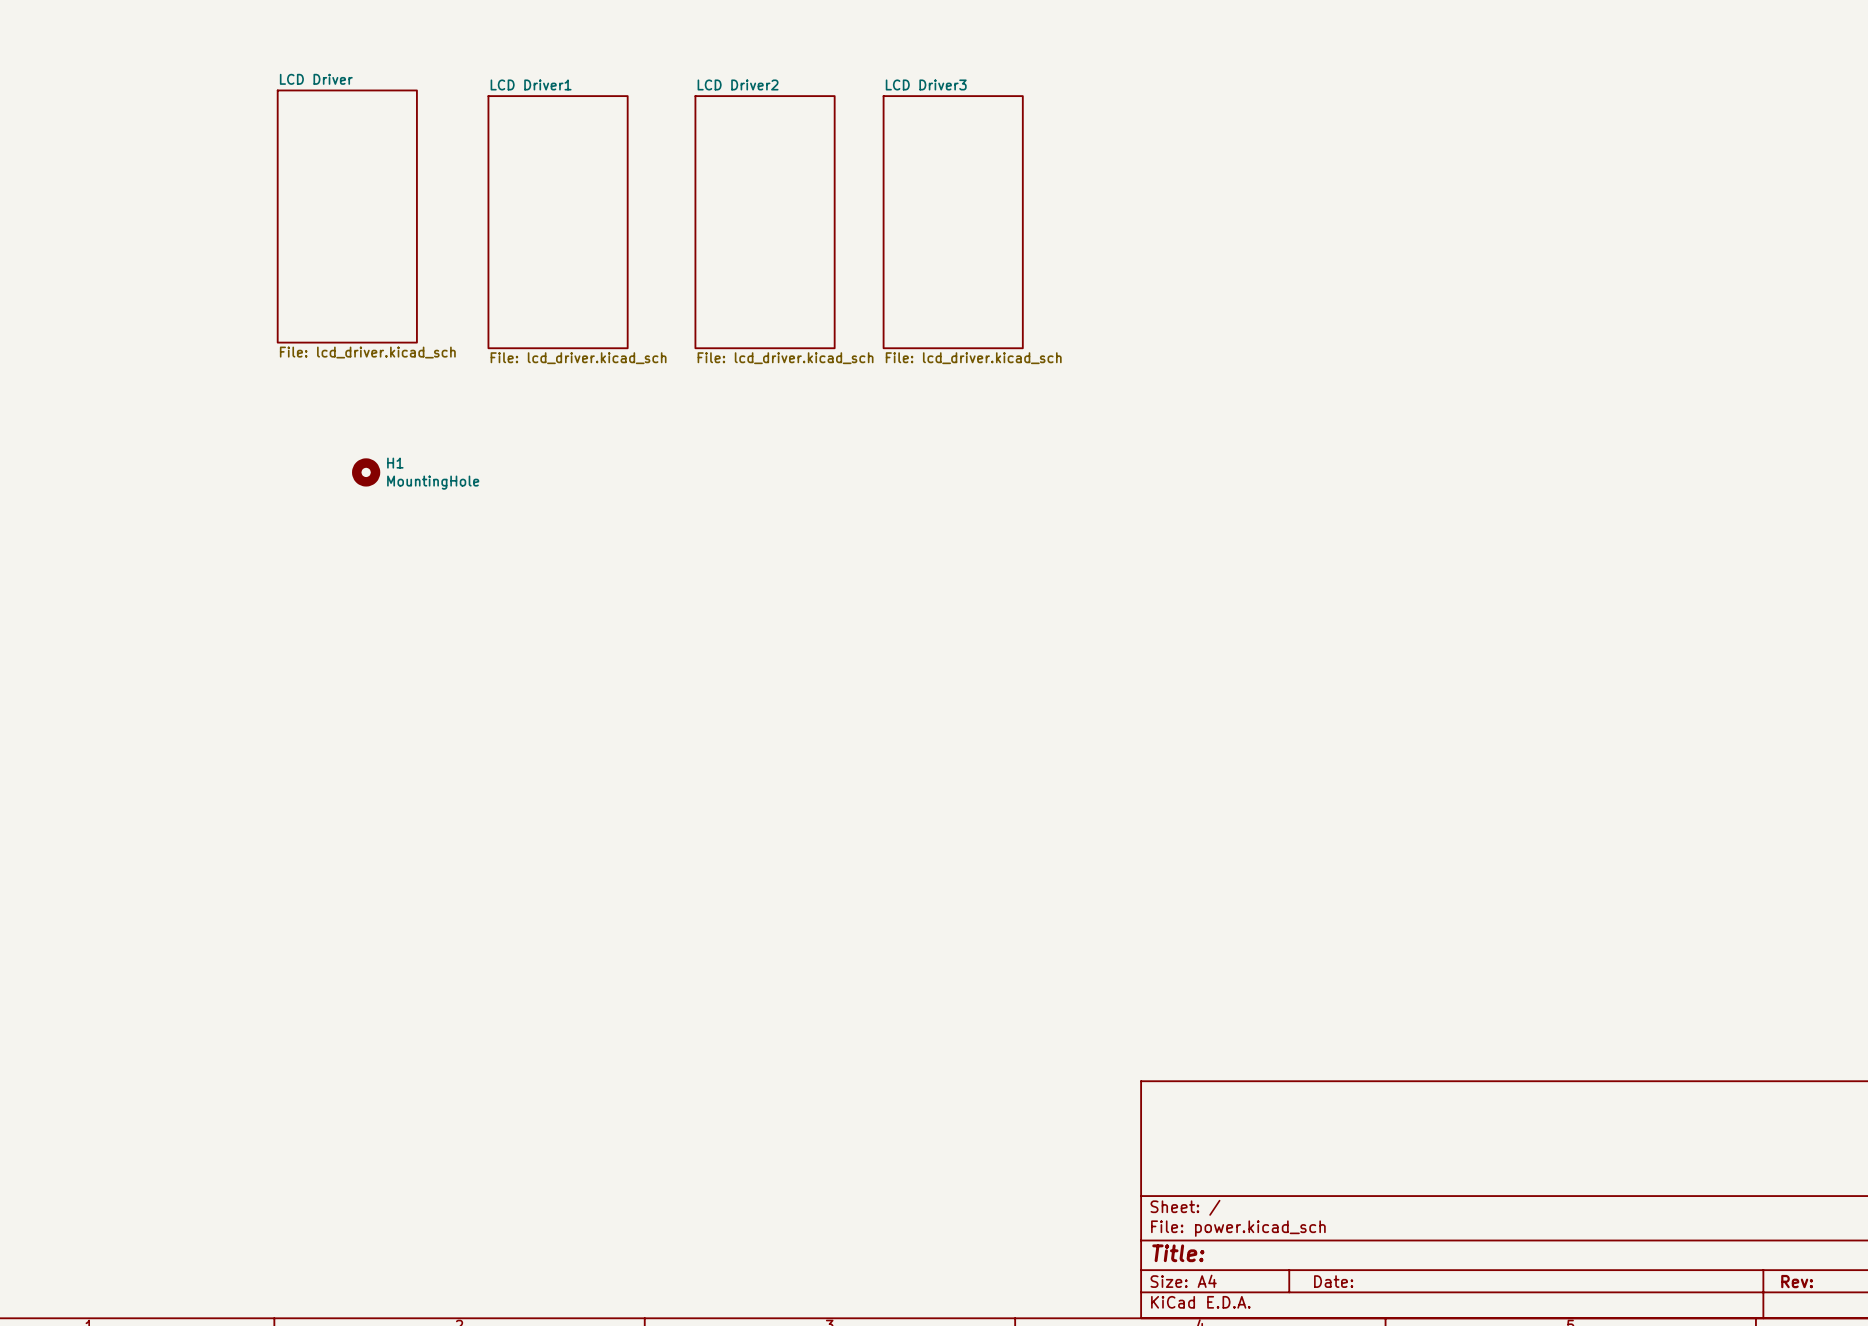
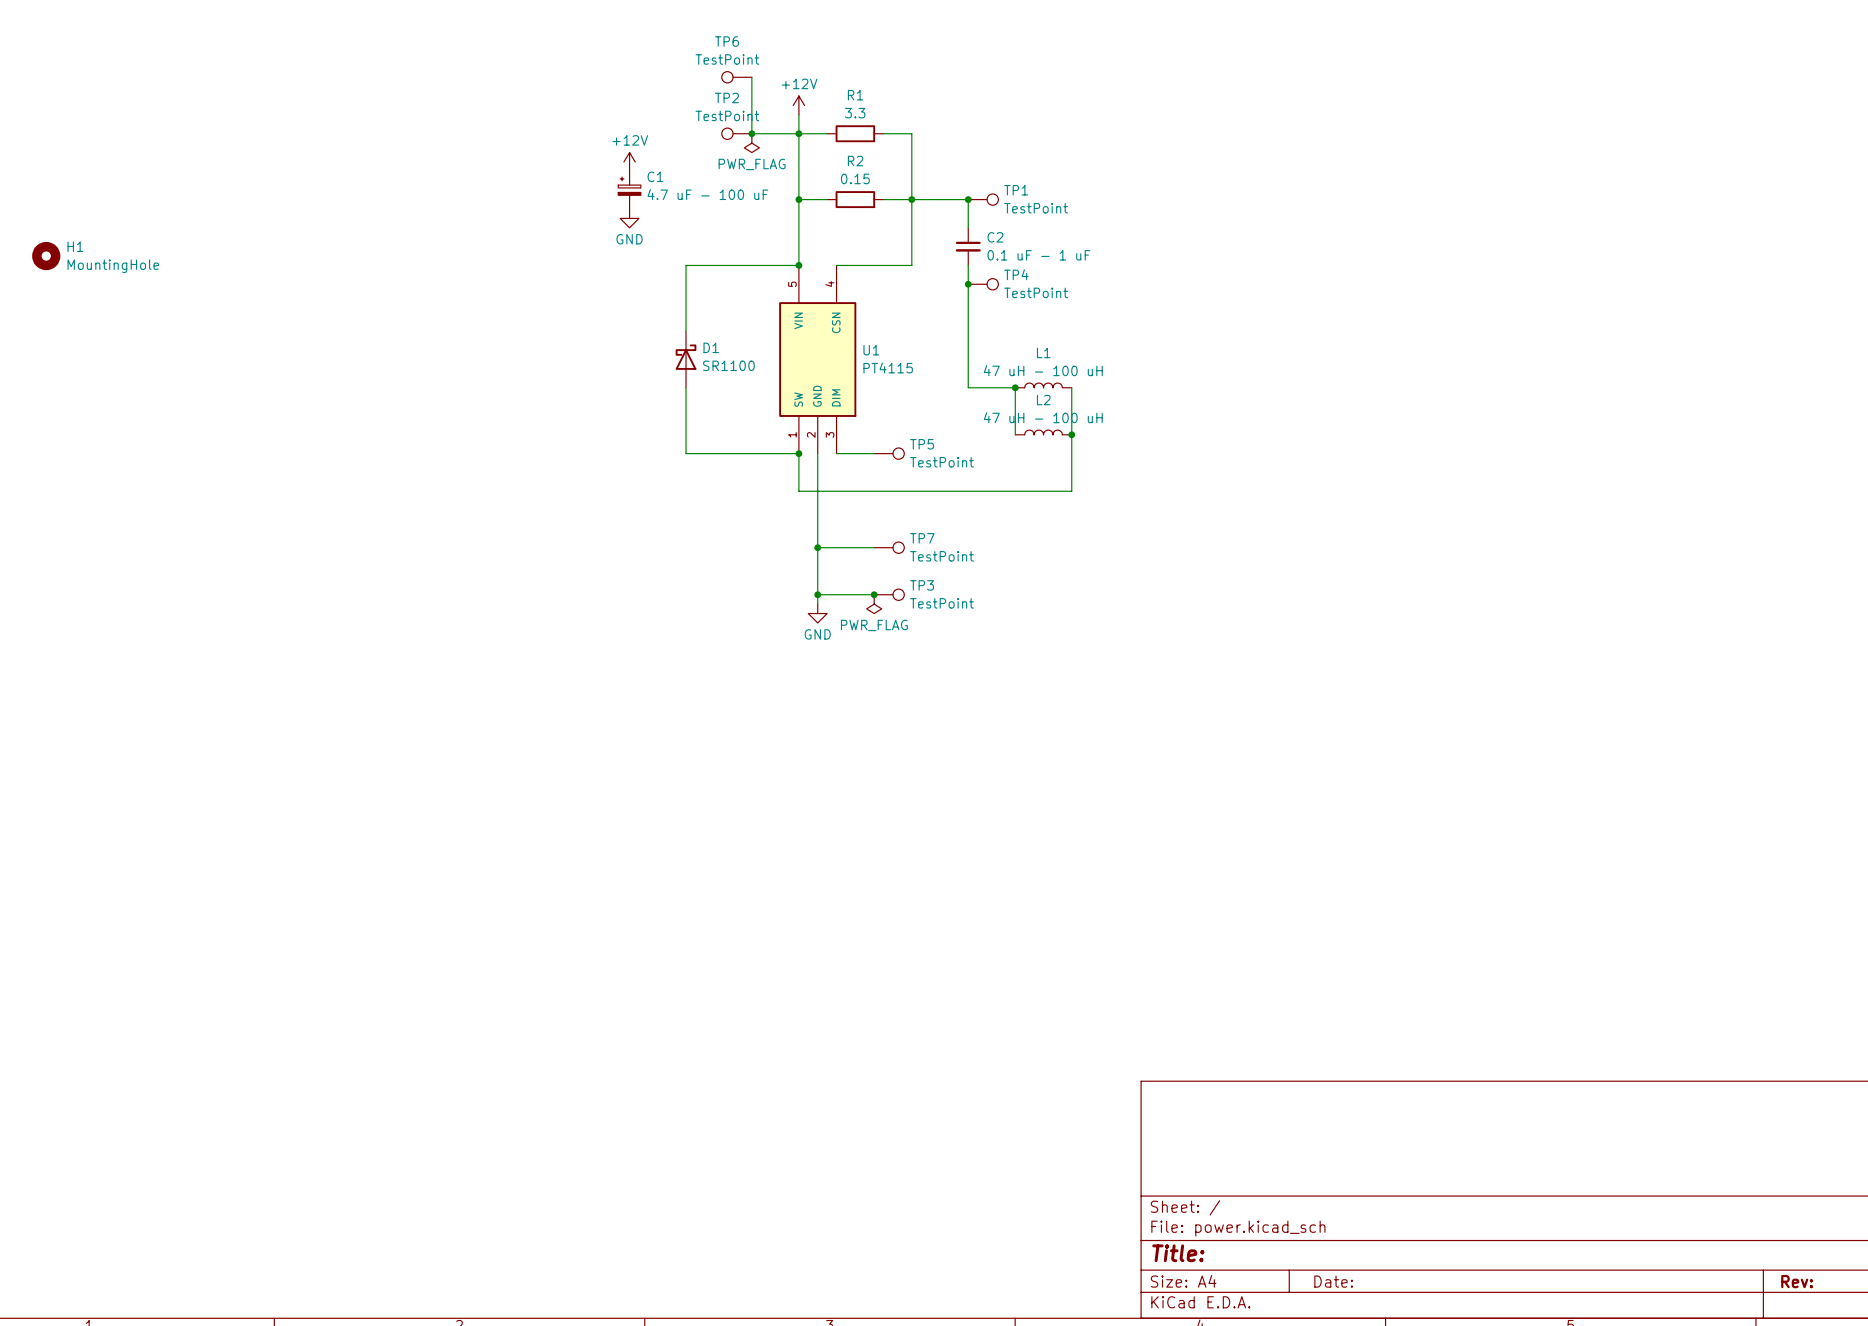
TP6: none -> TestPoint (736, 77)
wire: none -> (751, 77) (751, 133) (827, 133)
power symbol: none -> +12V (798, 105)
wire: none -> (798, 114) (798, 265) (686, 265) (686, 331)
TP2: none -> TestPoint (736, 133)
junction: none -> (751, 133)
junction: none -> (798, 133)
R1: none -> 3.3 (855, 133)
wire: none -> (883, 133) (911, 133) (911, 265) (836, 265)
power symbol: none -> PWR_FLAG (751, 143)
power symbol: none -> +12V (629, 161)
C1: none -> 4.7 uF - 100 uF (629, 190)
wire: none -> (798, 199) (827, 199)
junction: none -> (798, 199)
R2: none -> 0.15 (855, 199)
wire: none -> (883, 199) (968, 199) (968, 227)
junction: none -> (911, 199)
junction: none -> (968, 199)
TP1: none -> TestPoint (983, 199)
sheet LCD Driver: File: lcd_driver.kicad_sch (347, 216) -> none
power symbol: none -> GND (629, 218)
sheet LCD Driver1: File: lcd_driver.kicad_sch (558, 222) -> none
sheet LCD Driver2: File: lcd_driver.kicad_sch (765, 222) -> none
sheet LCD Driver3: File: lcd_driver.kicad_sch (953, 222) -> none
C2: none -> 0.1 uF - 1 uF (968, 246)
junction: none -> (798, 265)
wire: none -> (968, 265) (968, 387) (1015, 387) (1015, 434)
junction: none -> (968, 284)
TP4: none -> TestPoint (983, 284)
D1: none -> SR1100 (686, 359)
U1: none -> PT4115 (817, 359)
L1: none -> 47 uH - 100 uH (1043, 385)
wire: none -> (686, 387) (686, 453) (798, 453) (798, 491) (1071, 491) (1071, 387)
junction: none -> (1015, 387)
L2: none -> 47 uH - 100 uH (1043, 432)
junction: none -> (1071, 434)
junction: none -> (798, 453)
wire: none -> (817, 453) (817, 604)
wire: none -> (836, 453) (874, 453)
TP5: none -> TestPoint (889, 453)
H1 position: (366, 472) -> (46, 256)
wire: none -> (817, 547) (874, 547)
junction: none -> (817, 547)
TP7: none -> TestPoint (889, 547)
wire: none -> (817, 594) (874, 594)
junction: none -> (817, 594)
junction: none -> (874, 594)
TP3: none -> TestPoint (889, 594)
power symbol: none -> PWR_FLAG (874, 604)
power symbol: none -> GND (817, 613)

